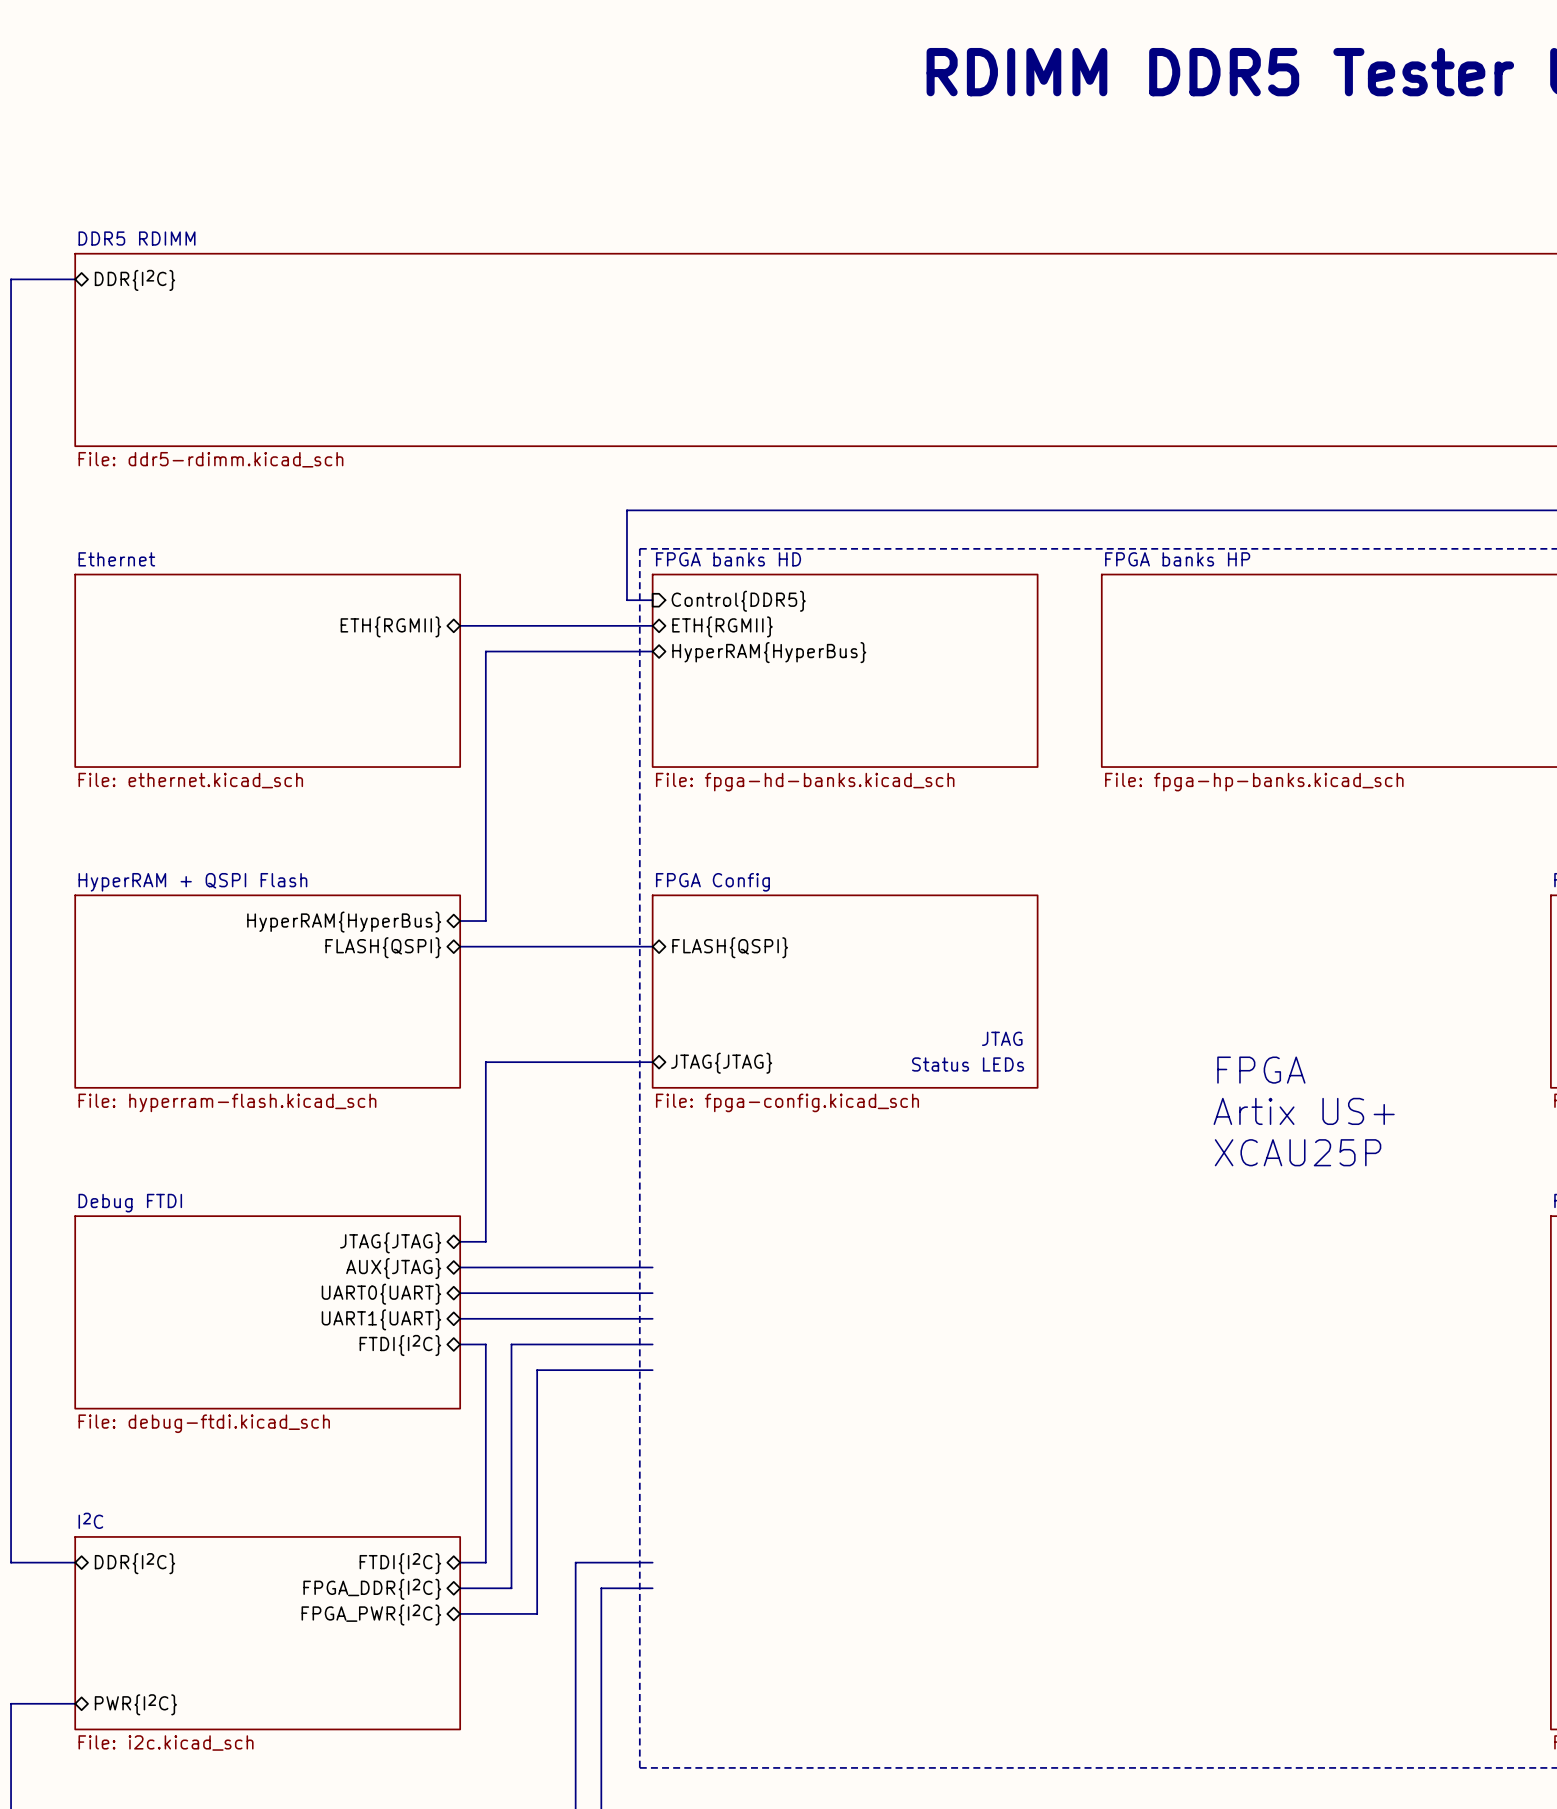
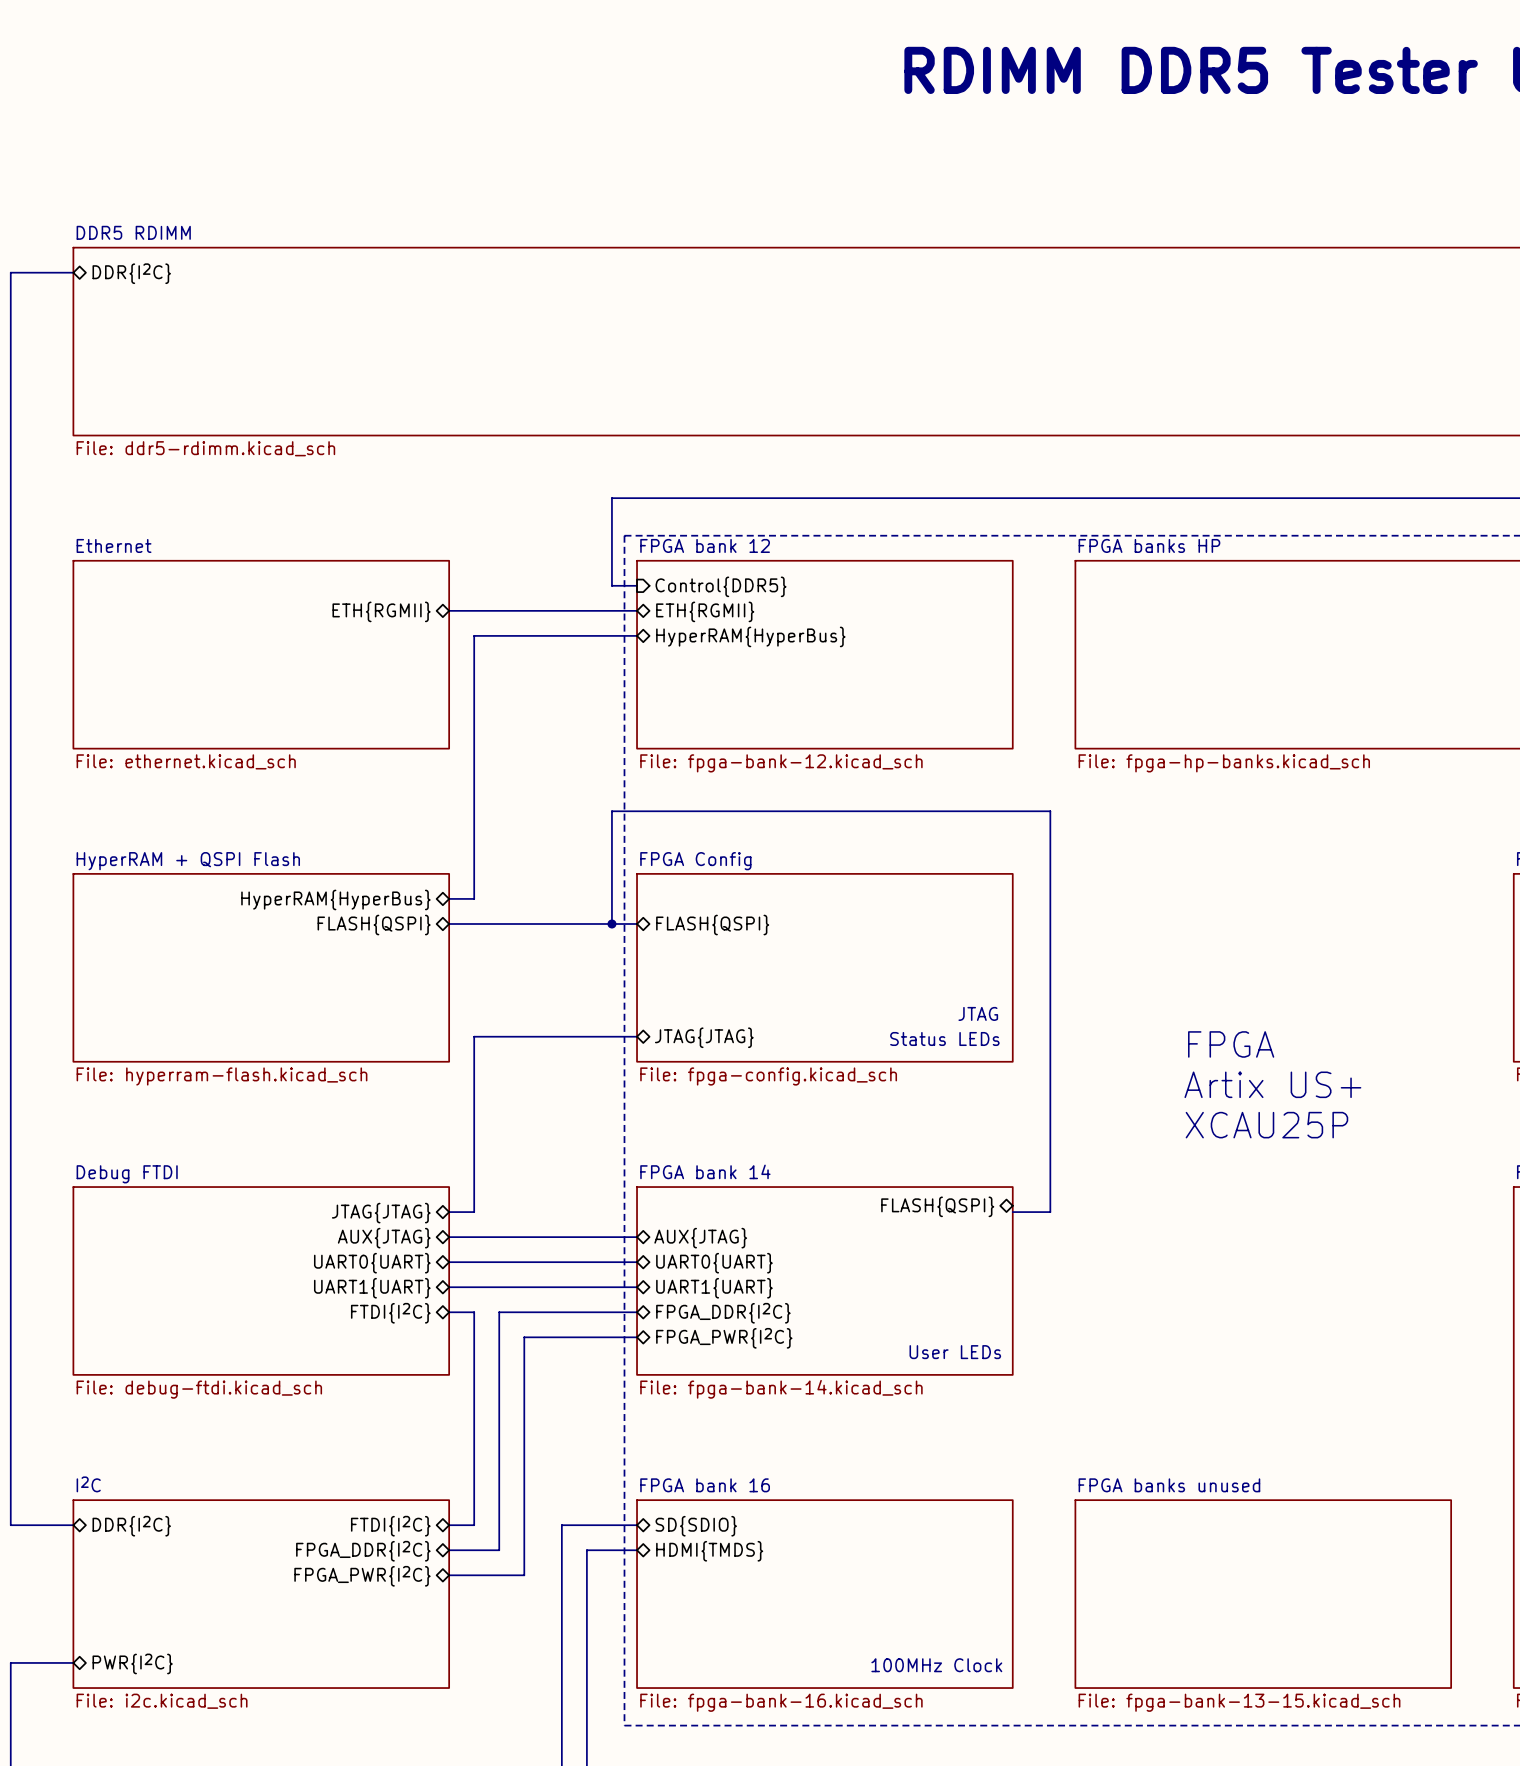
sheet FPGA banks HD name: FPGA banks HD (728, 559) -> FPGA bank 12 (705, 545)
sheet FPGA banks HD value: File: fpga-hd-banks.kicad_sch (805, 782) -> File: fpga-bank-12.kicad_sch (781, 763)
bus: none -> (611, 923) (611, 811) (1050, 811) (1050, 1212) (1012, 1212)
junction: none -> (611, 923)
sheet pin: none -> FLASH{QSPI} (937, 1206)
sheet pin: none -> AUX{JTAG} (700, 1238)
sheet pin: none -> UART0{UART} (714, 1263)
sheet FPGA bank 14: none -> File: fpga-bank-14.kicad_sch (824, 1280)
sheet pin: none -> UART1{UART} (714, 1288)
sheet pin: none -> FPGA_DDR{I2C} (723, 1313)
sheet pin: none -> FPGA_PWR{I2C} (724, 1338)
text: none -> User LEDs (955, 1352)
sheet pin: none -> SD{SDIO} (696, 1526)
sheet pin: none -> HDMI{TMDS} (709, 1551)
sheet FPGA bank 16: none -> File: fpga-bank-16.kicad_sch (824, 1594)
sheet FPGA banks unused: none -> File: fpga-bank-13-15.kicad_sch (1263, 1594)
text: none -> 100MHz Clock (936, 1665)

